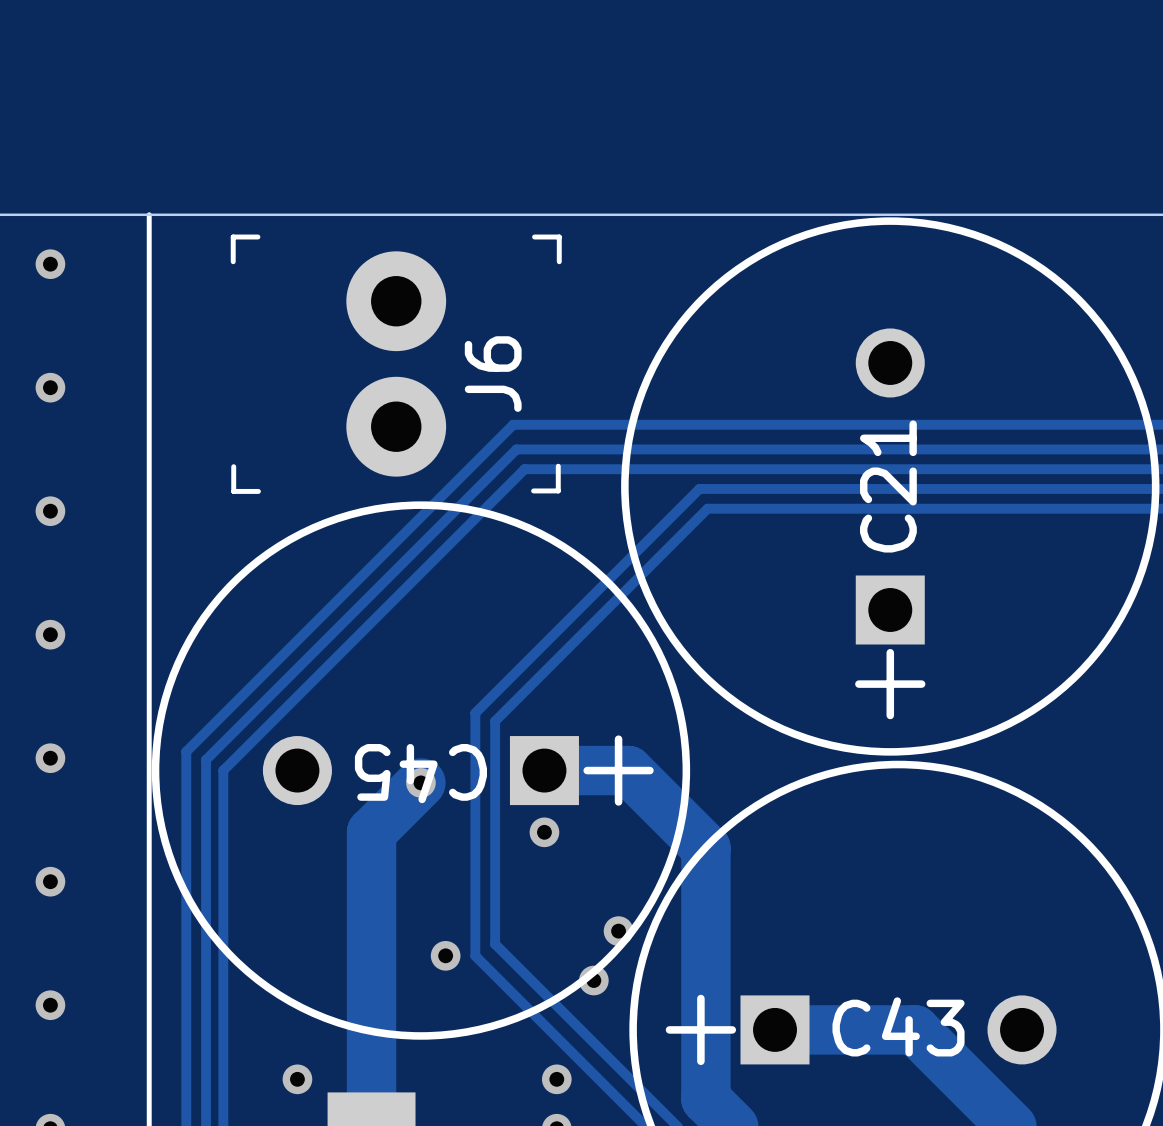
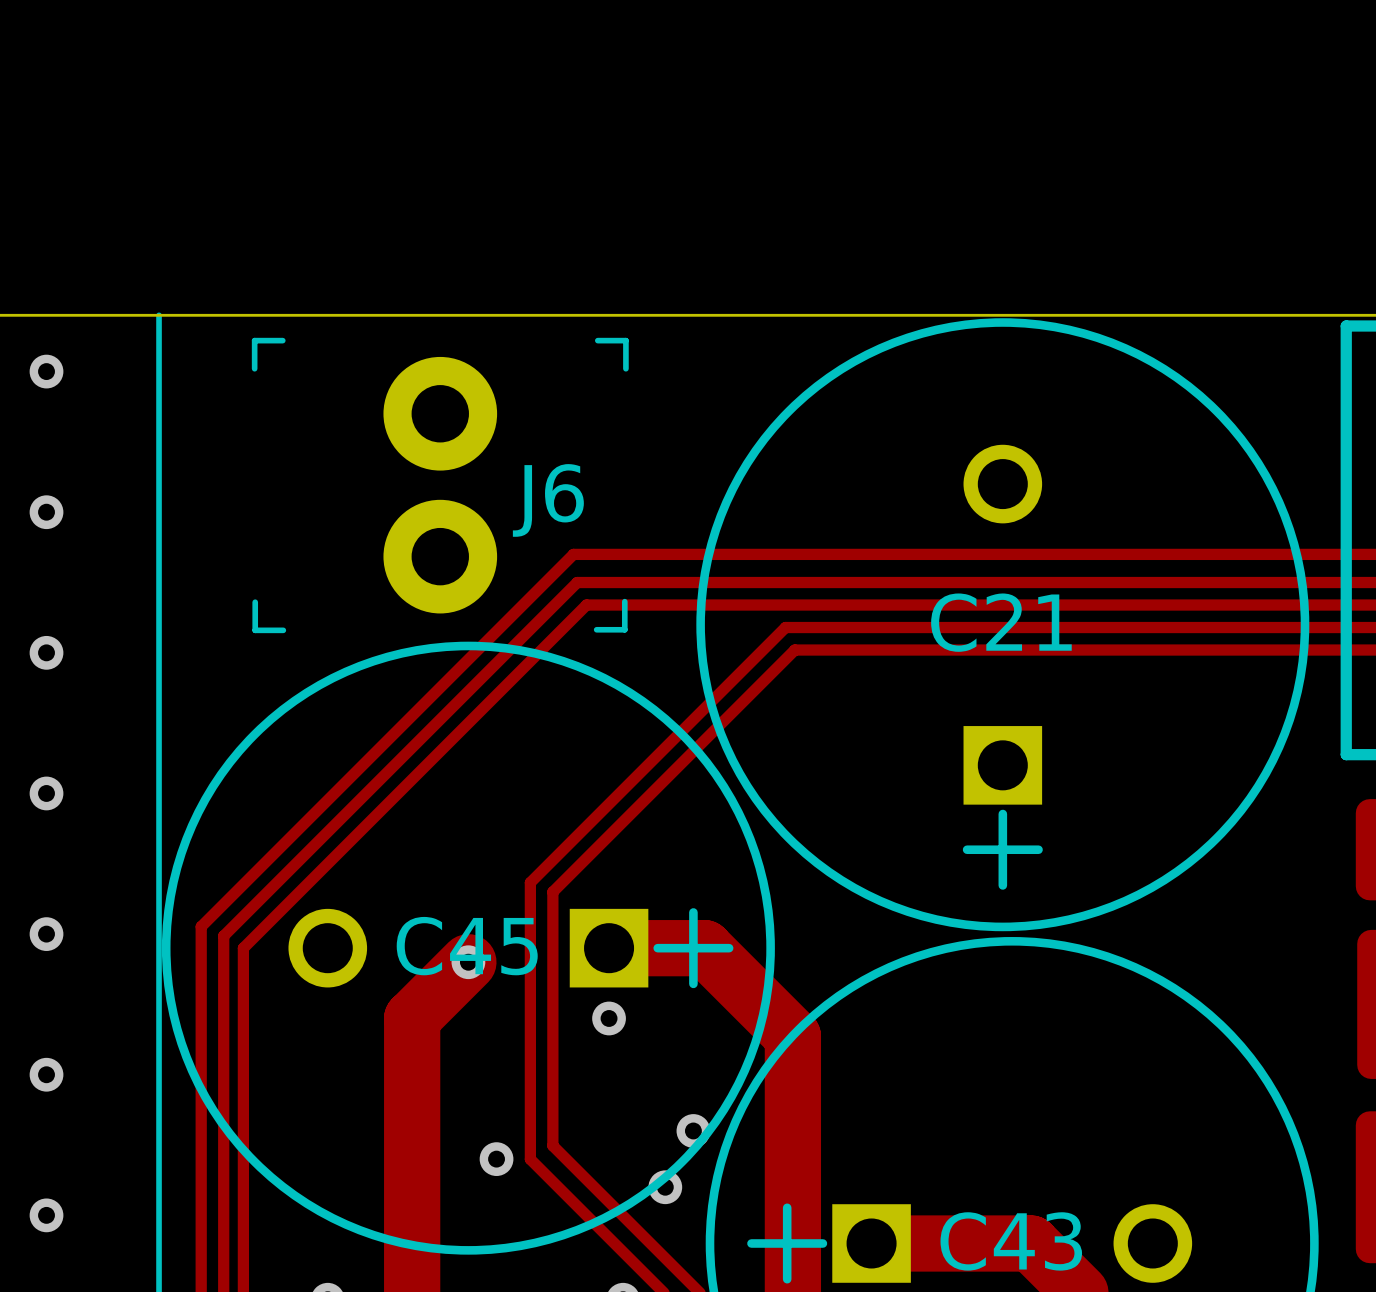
J6 name rotation: 0° (493, 374) -> 90° clockwise (548, 500)
C21 name rotation: 0° (888, 486) -> 90° clockwise (1001, 622)
C45 name rotation: 0° (420, 773) -> 180° (467, 946)

